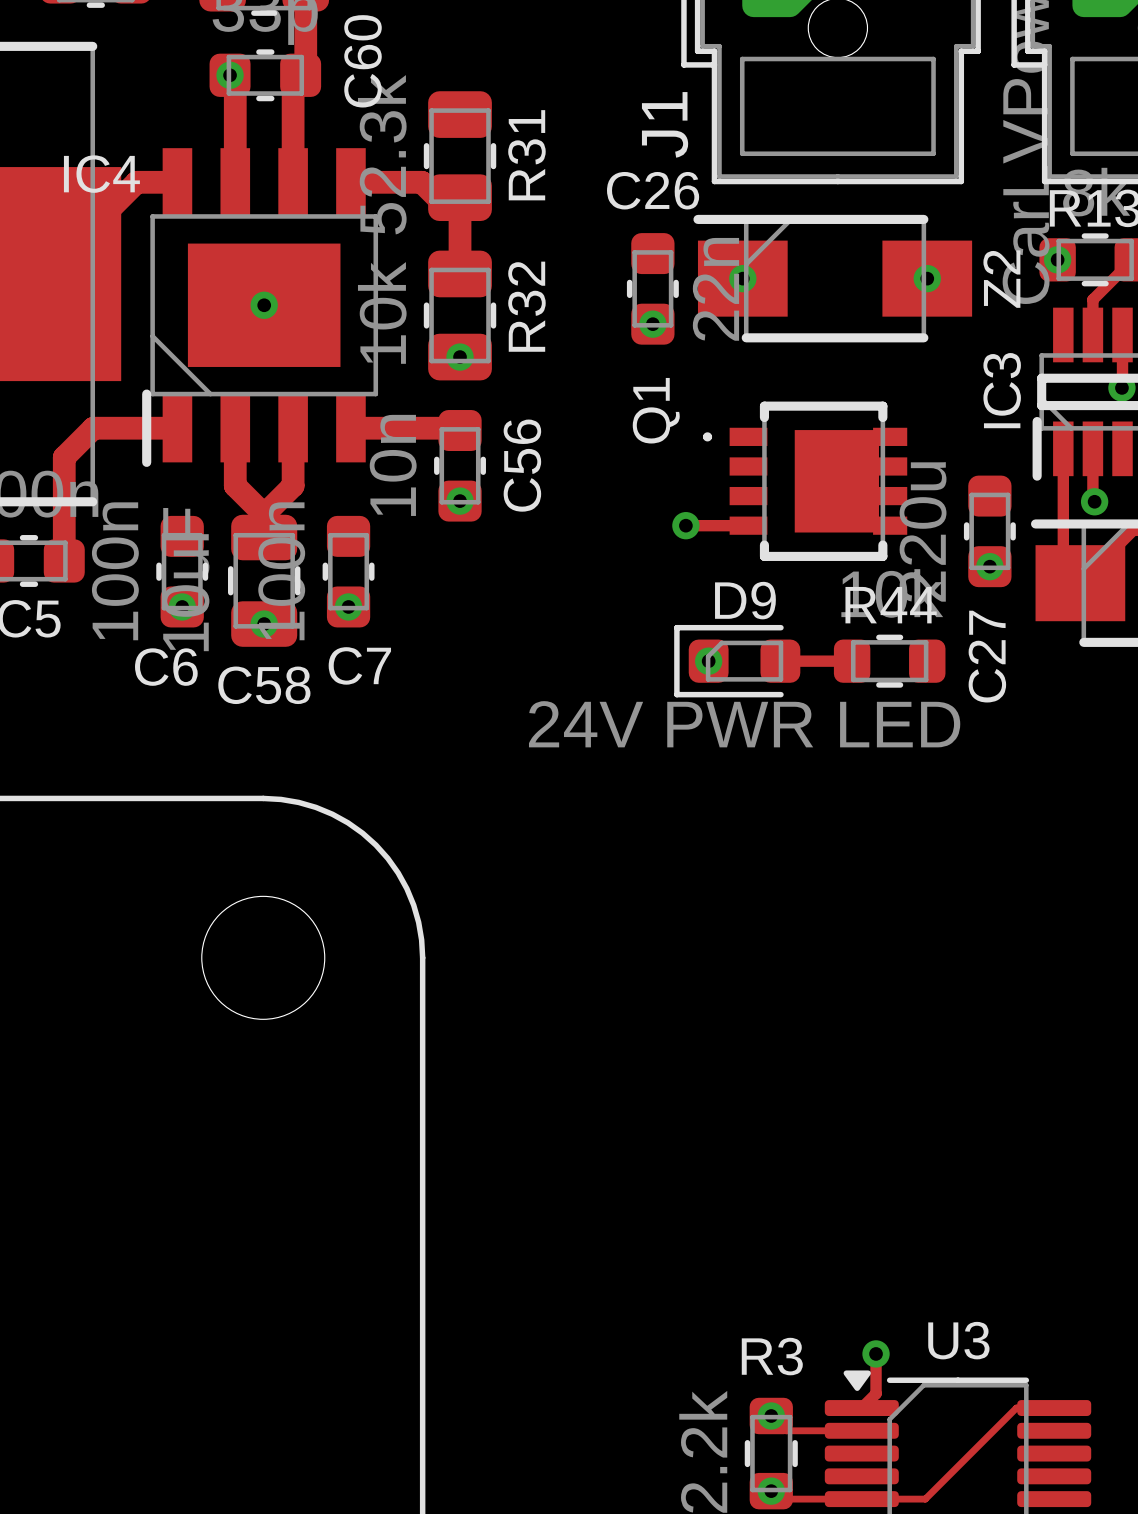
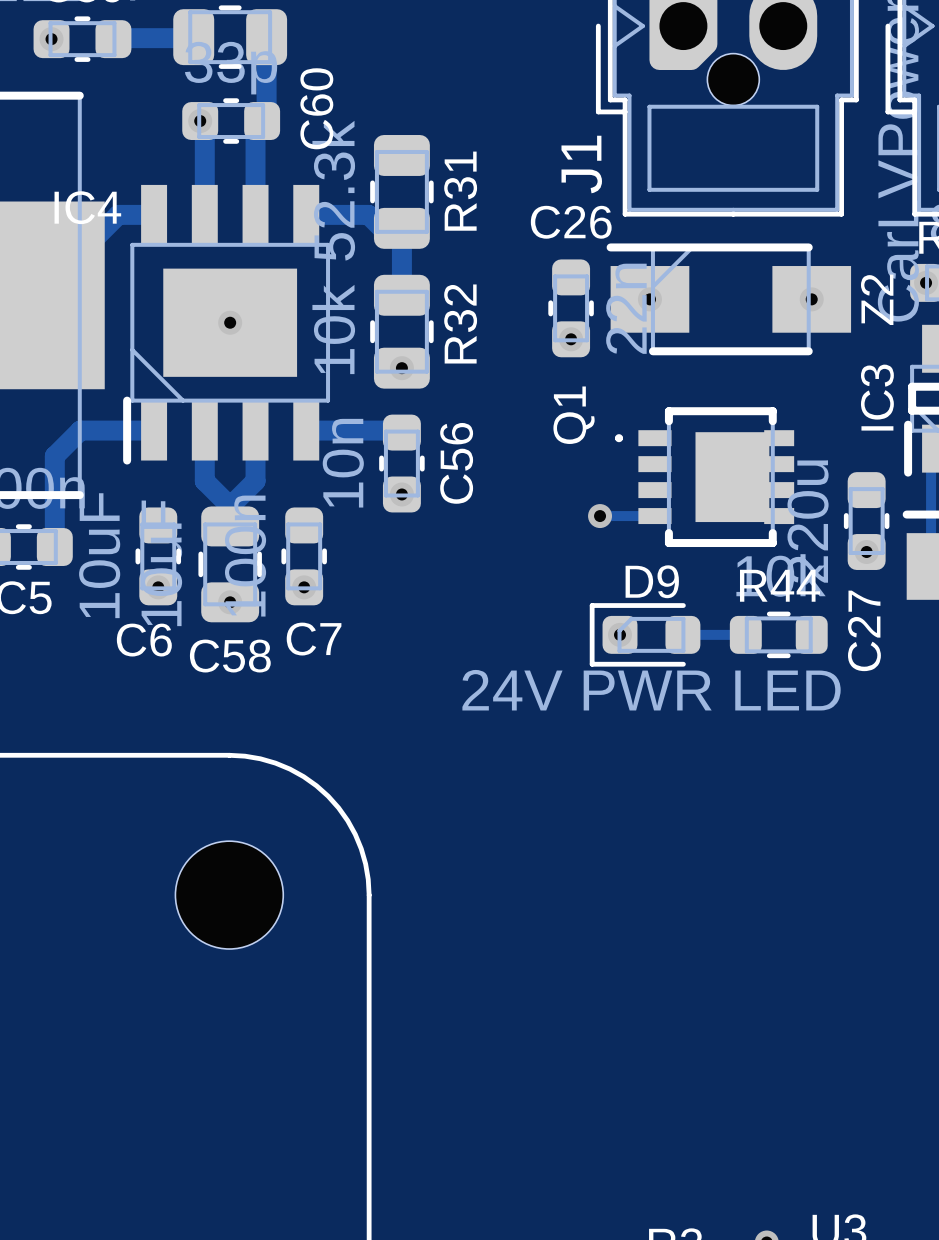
C6 value: 100n (115, 571) -> 10uF (99, 555)

